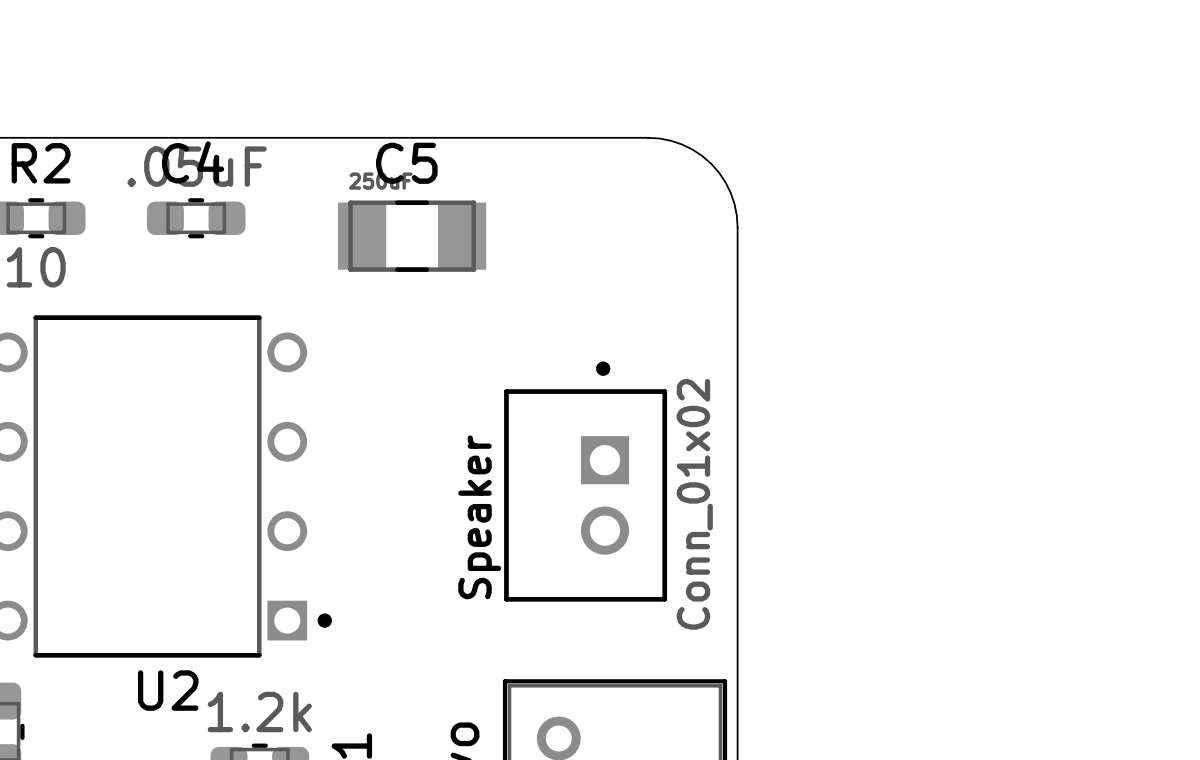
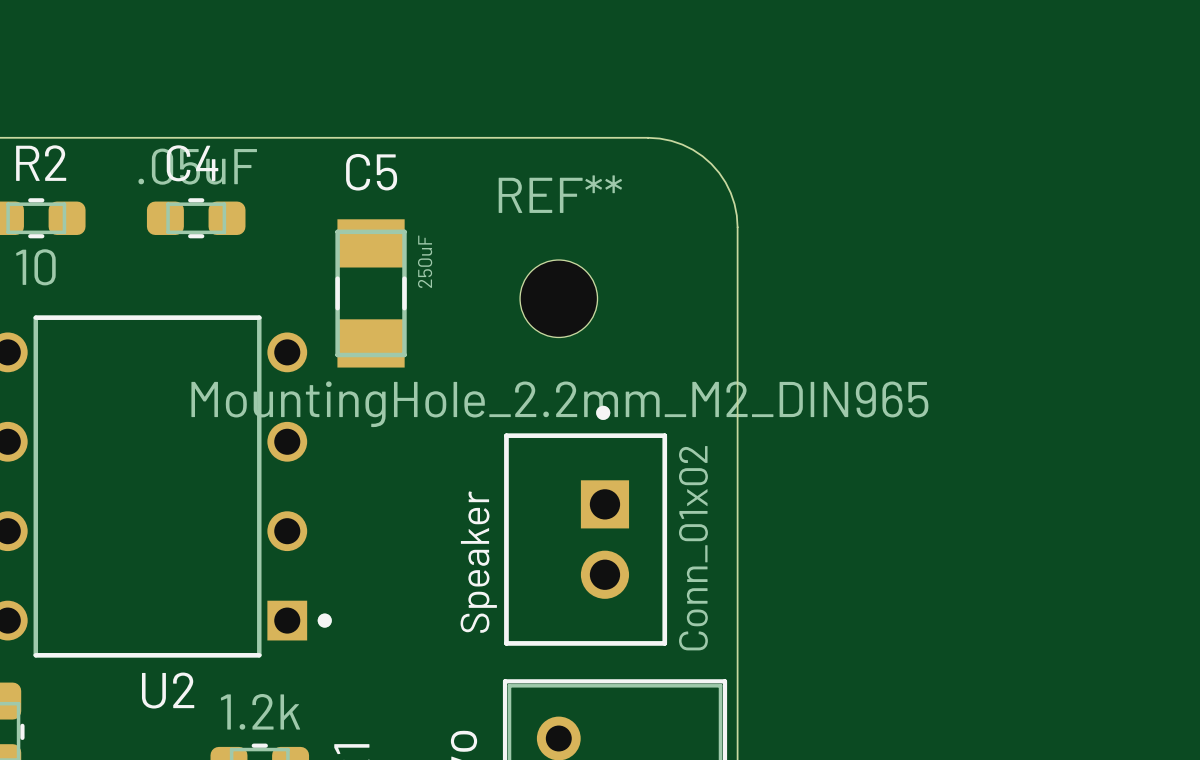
C5 rotation: 0° (412, 236) -> 90° clockwise (371, 293)
REF**: none -> MountingHole_2.2mm_M2_DIN965 (558, 298)
Speaker position: (585, 481) -> (585, 525)

